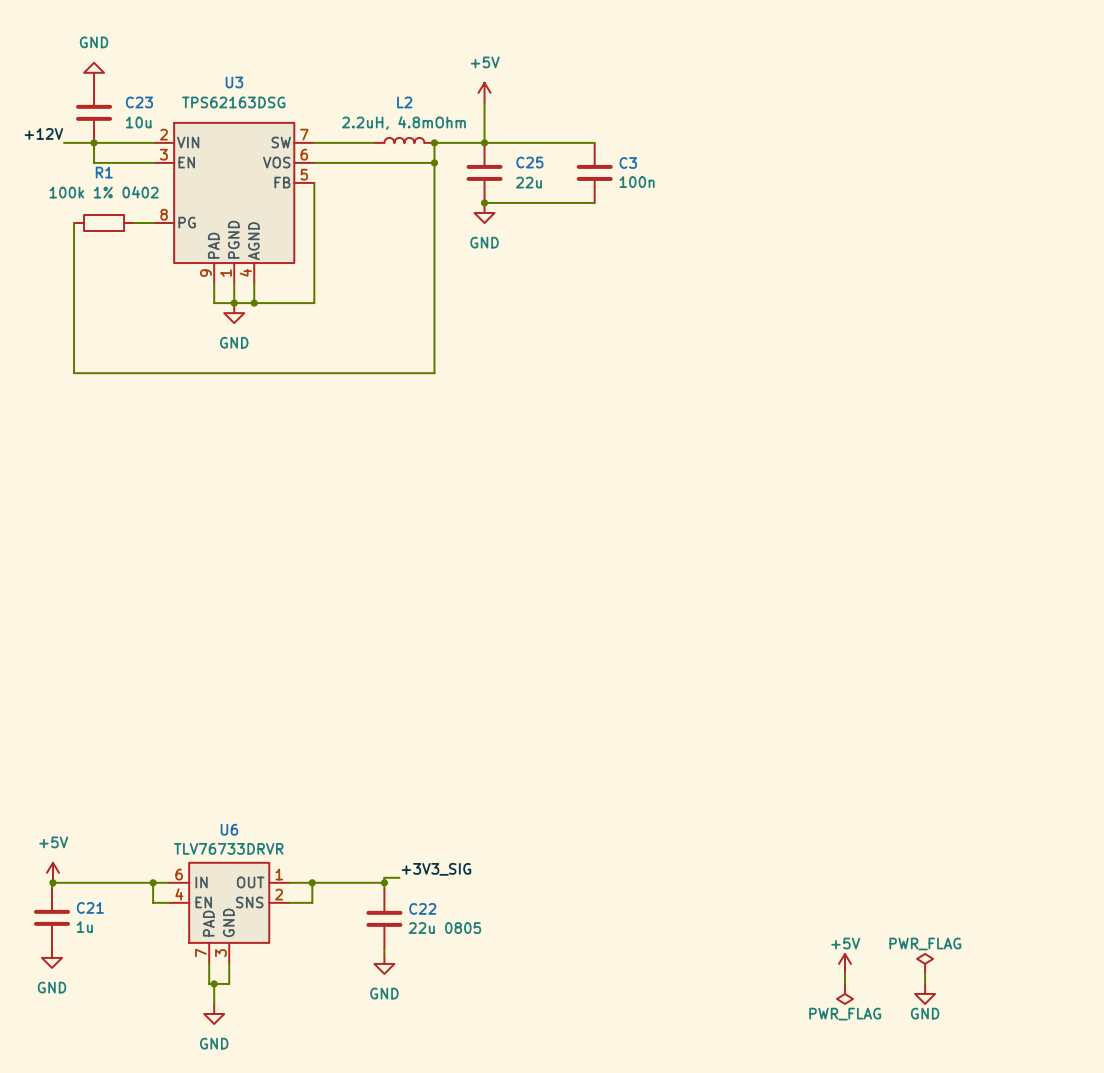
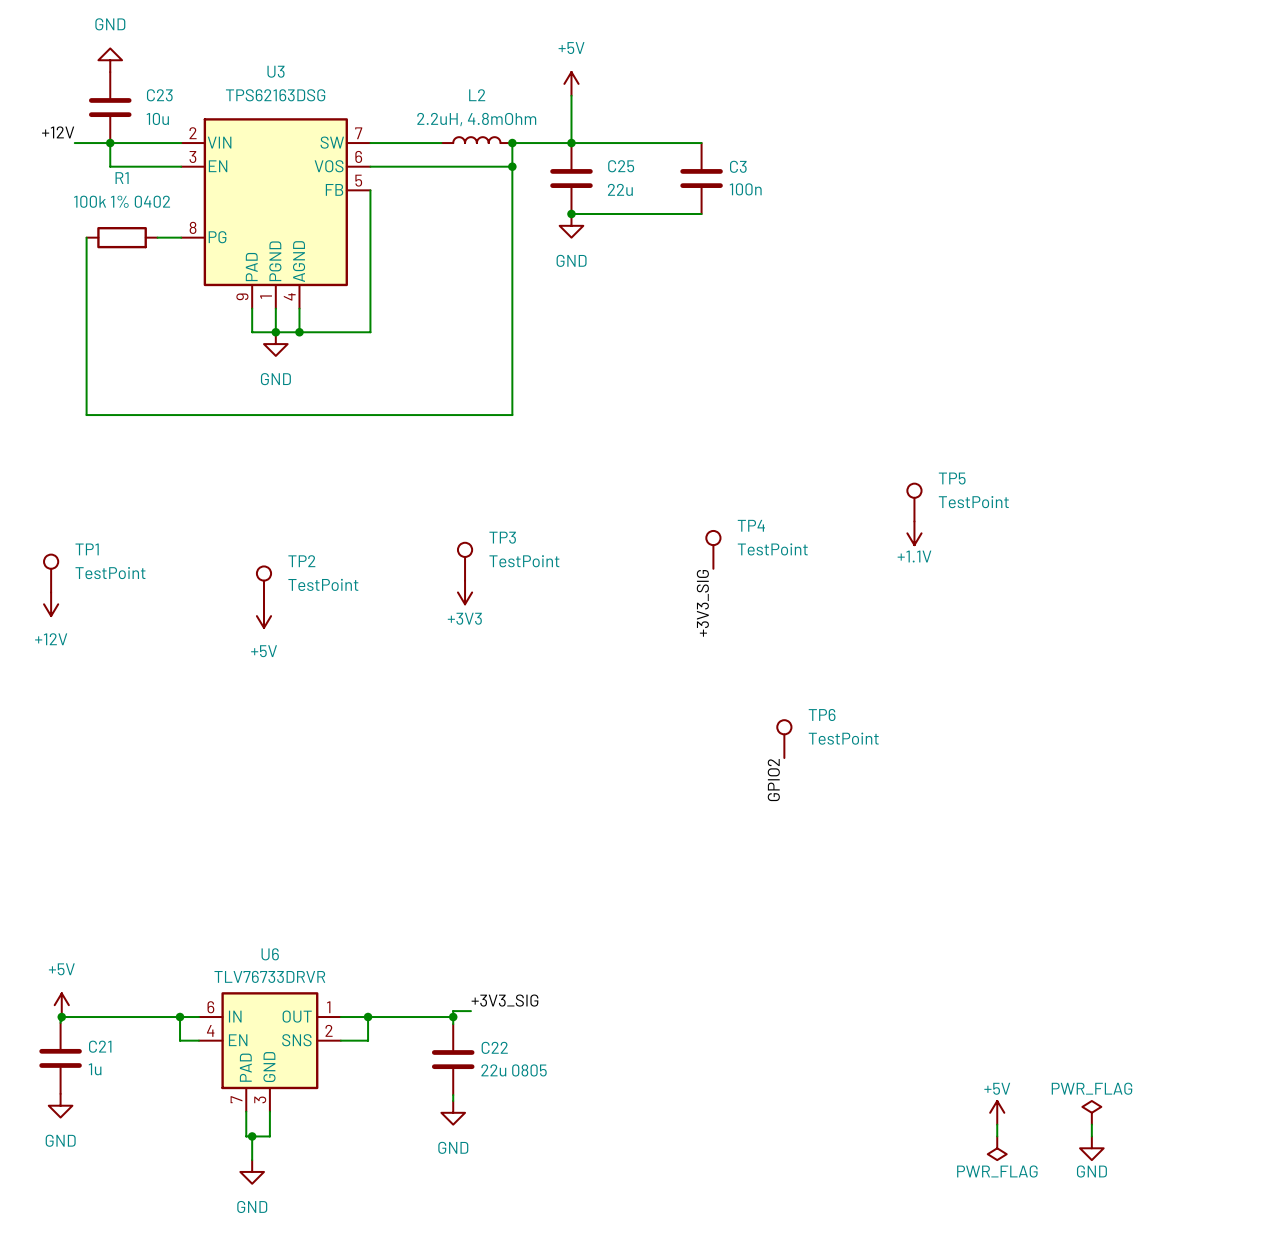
TP5: none -> TestPoint (914, 502)
power symbol: none -> +1.1V (914, 533)
TP4: none -> TestPoint (713, 549)
TP3: none -> TestPoint (465, 561)
TP1: none -> TestPoint (51, 573)
TP2: none -> TestPoint (263, 585)
power symbol: none -> +3V3 (465, 592)
power symbol: none -> +12V (51, 604)
label: none -> +3V3_SIG (702, 603)
power symbol: none -> +5V (263, 616)
TP6: none -> TestPoint (784, 739)
label: none -> GPIO2 (773, 780)

